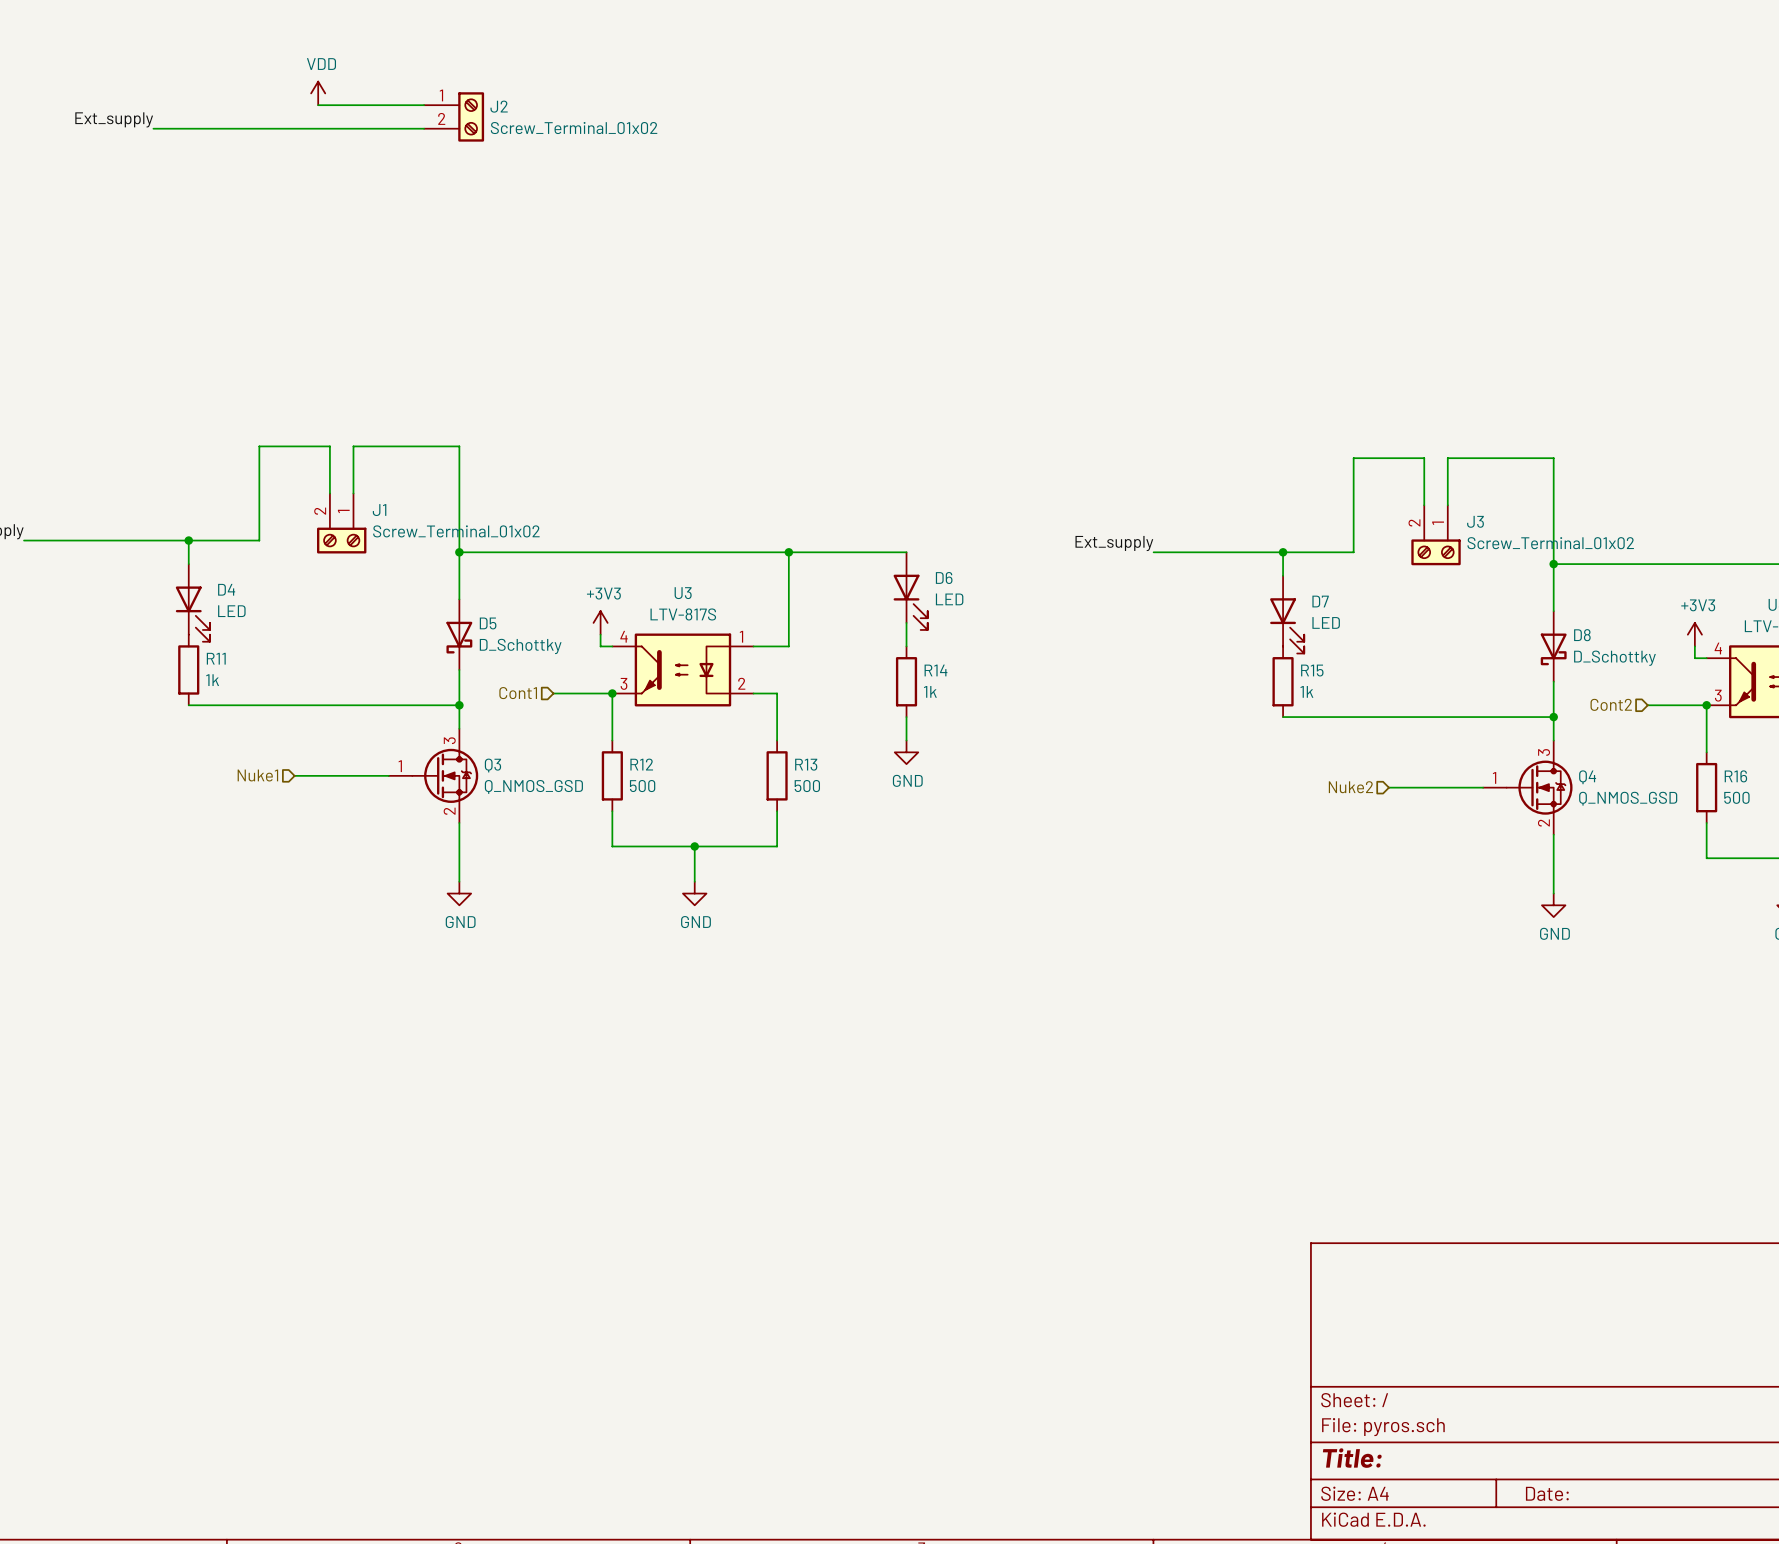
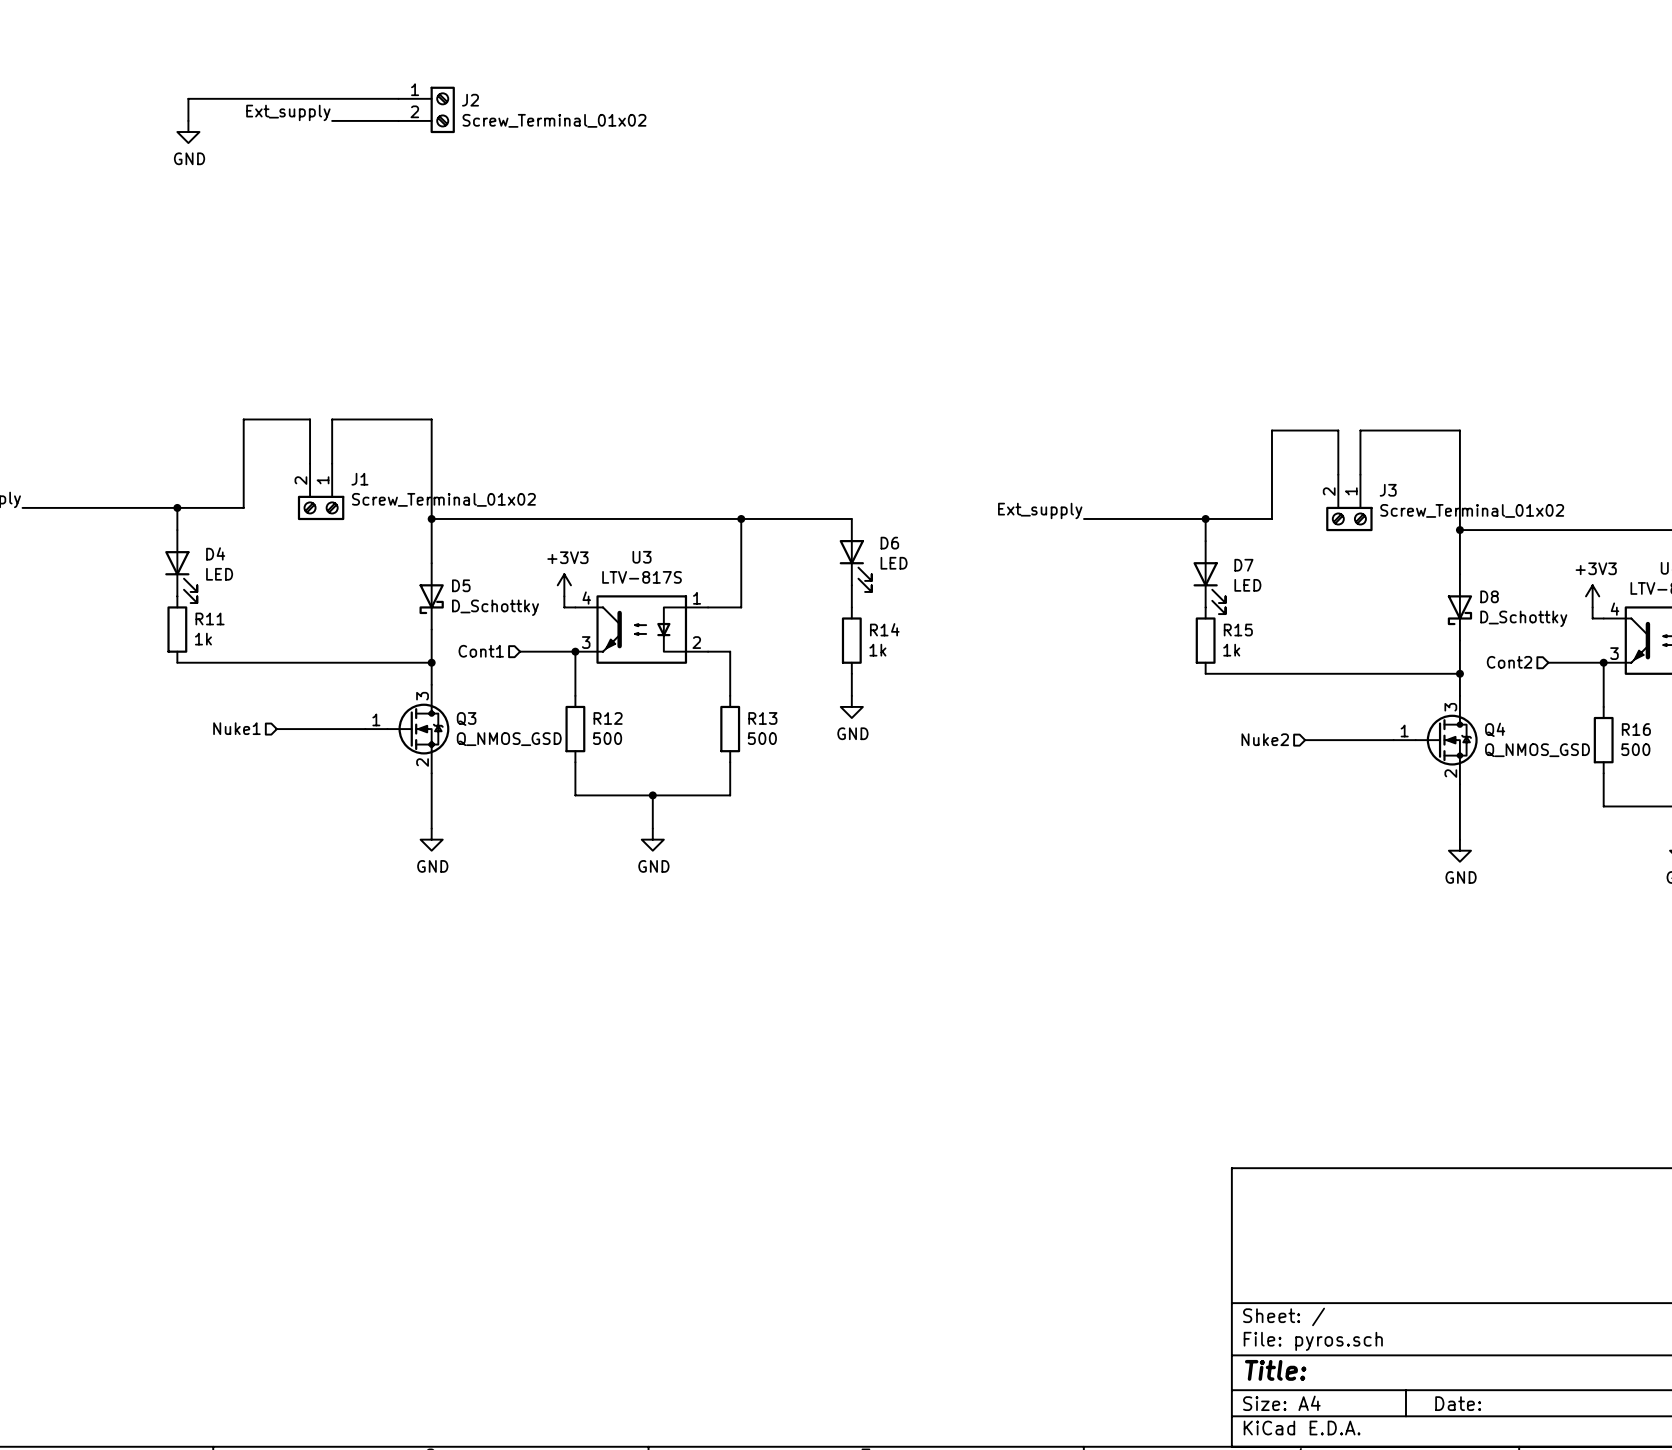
power symbol: VDD (318, 93) -> none
wire: none -> (298, 98) (188, 98) (188, 120)
label position: Ext_supply (114, 119) -> Ext_supply (288, 112)
wire: (153, 128) (353, 128) -> none
power symbol: none -> GND (188, 132)

